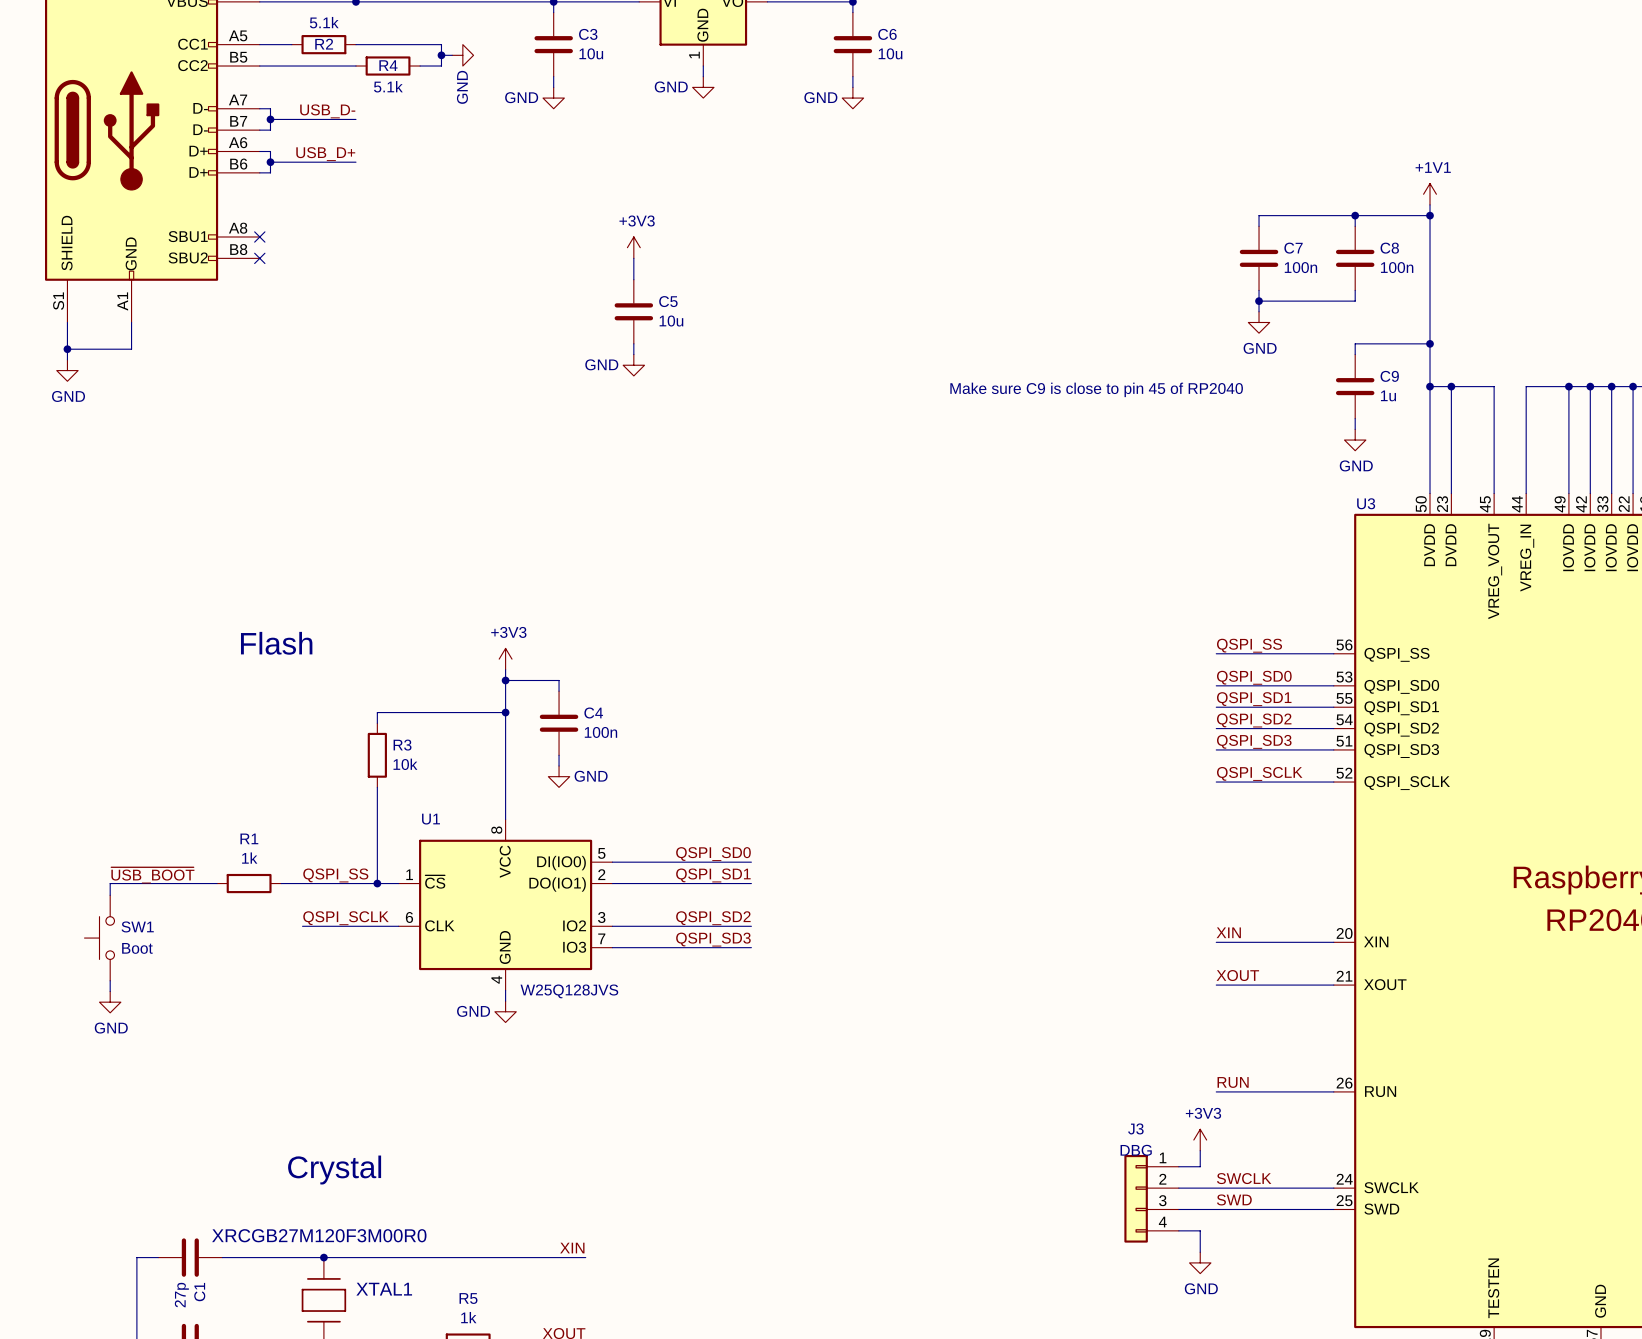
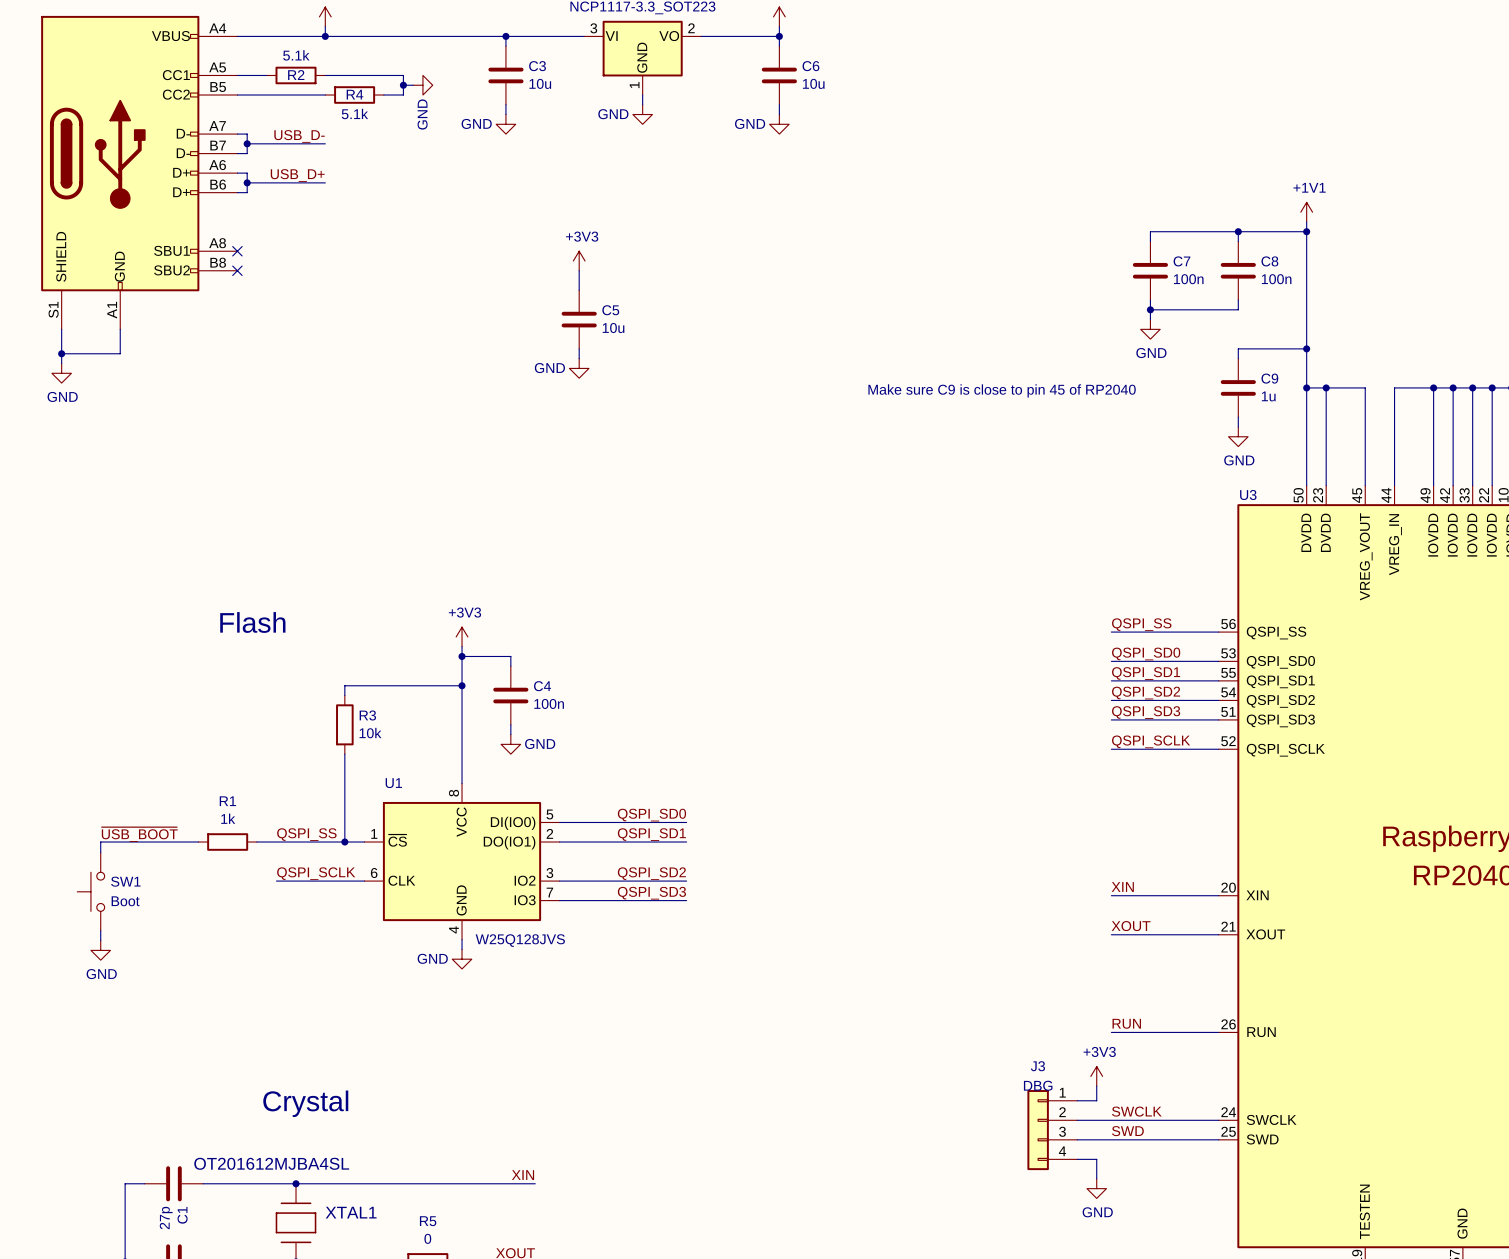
XTAL1 value: XRCGB27M120F3M00R0 (319, 1235) -> OT201612MJBA4SL (271, 1163)
R5 value: 1k (468, 1317) -> 0 (427, 1238)

